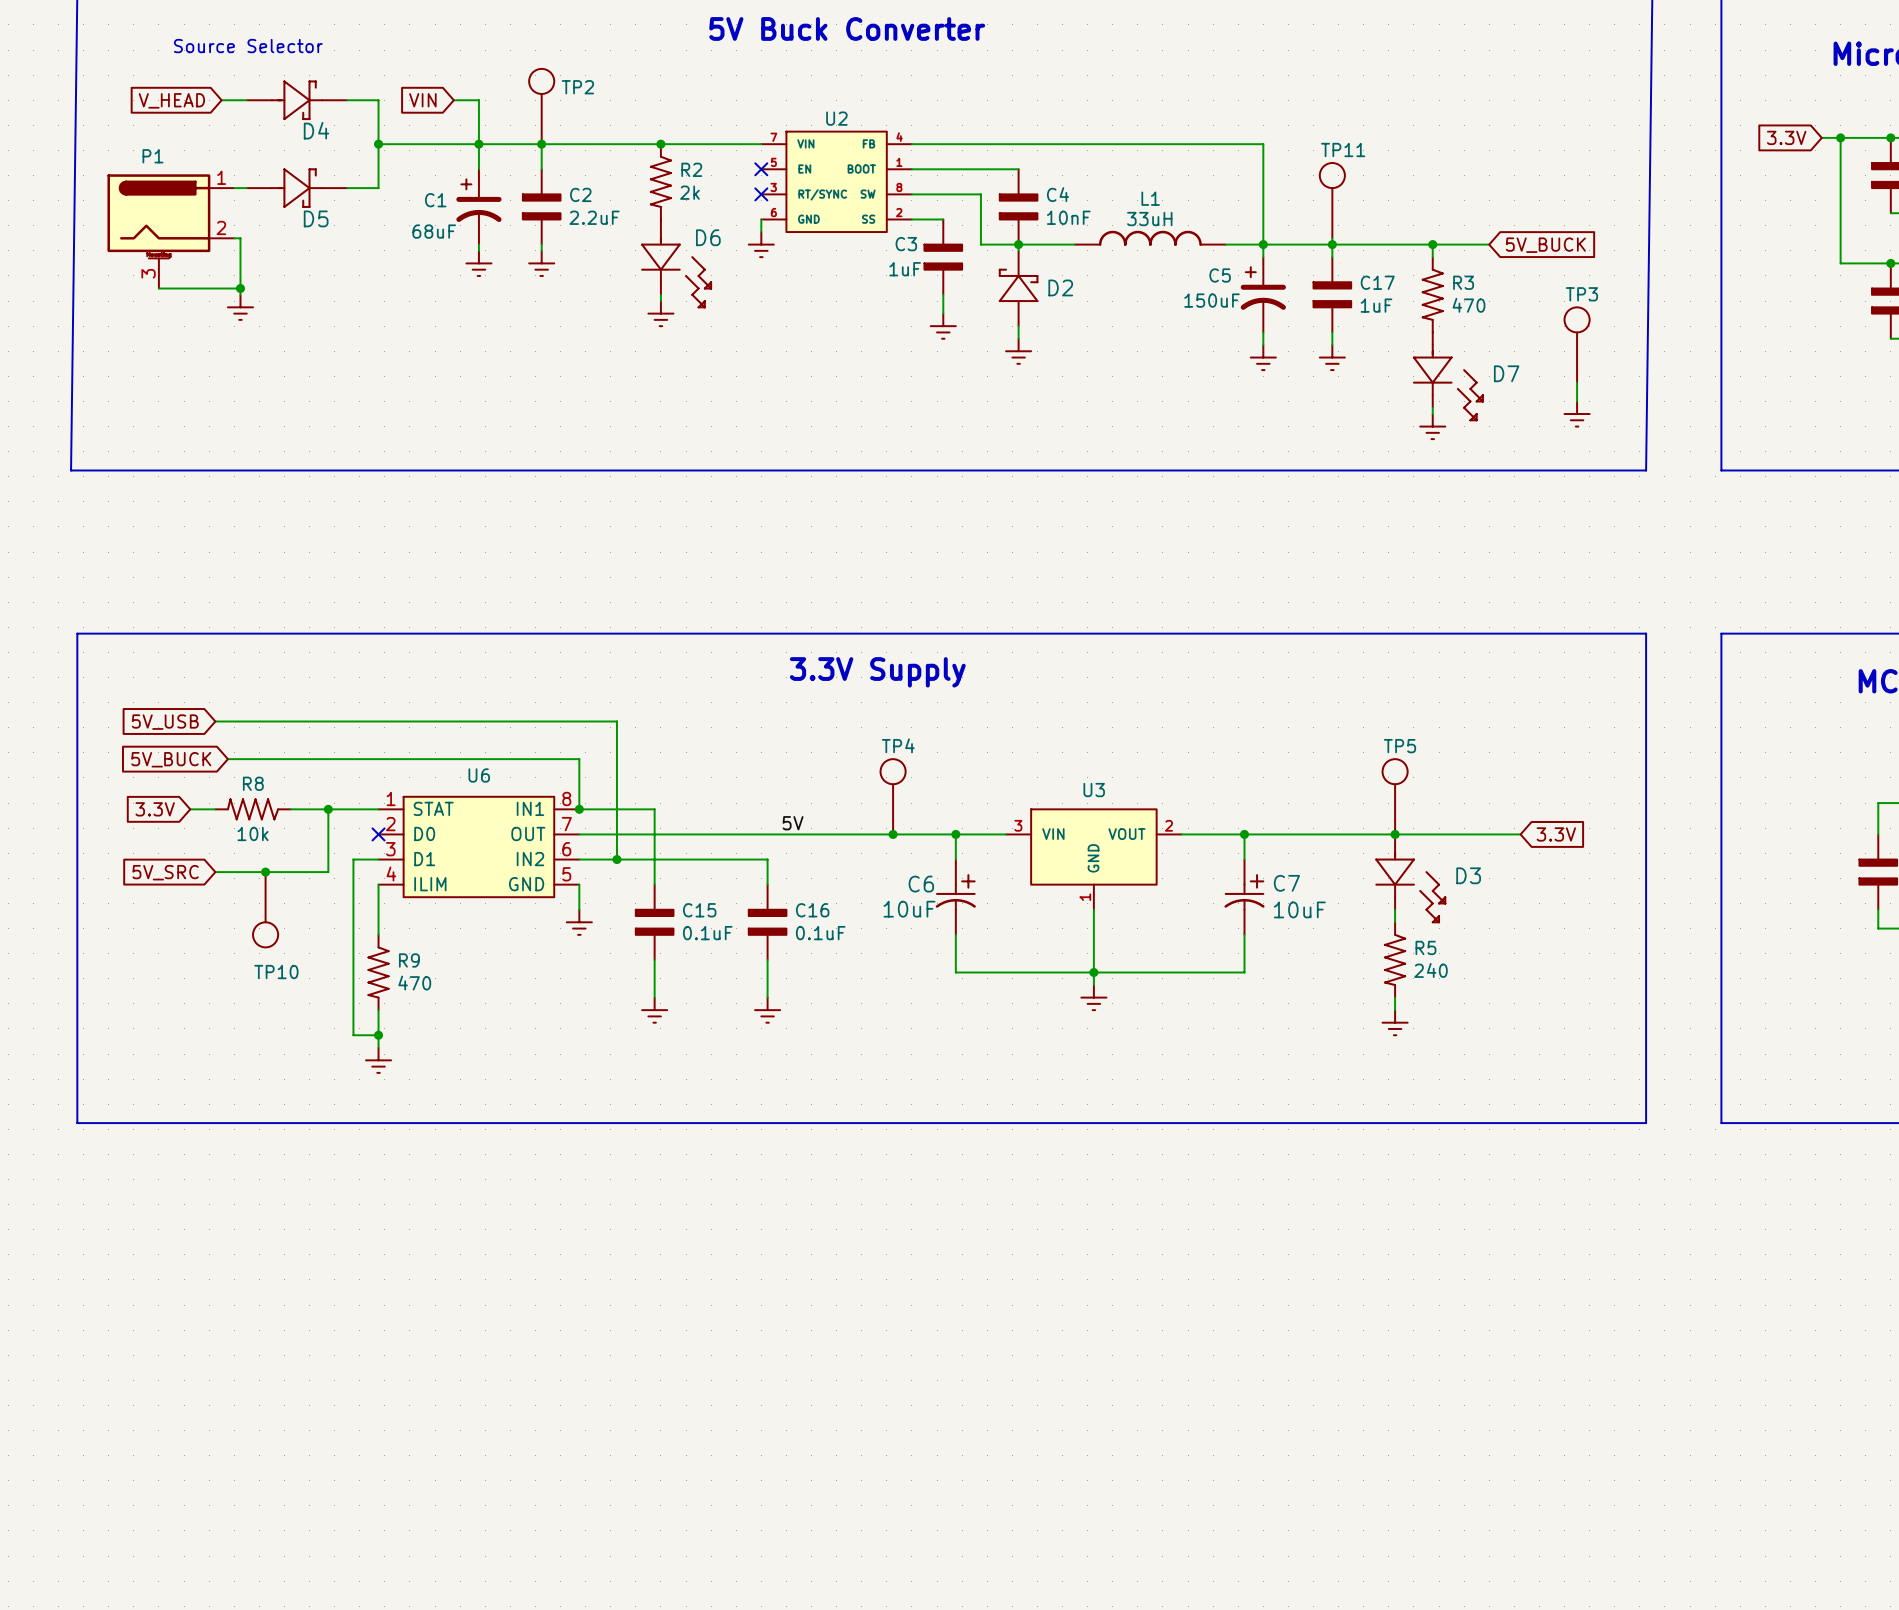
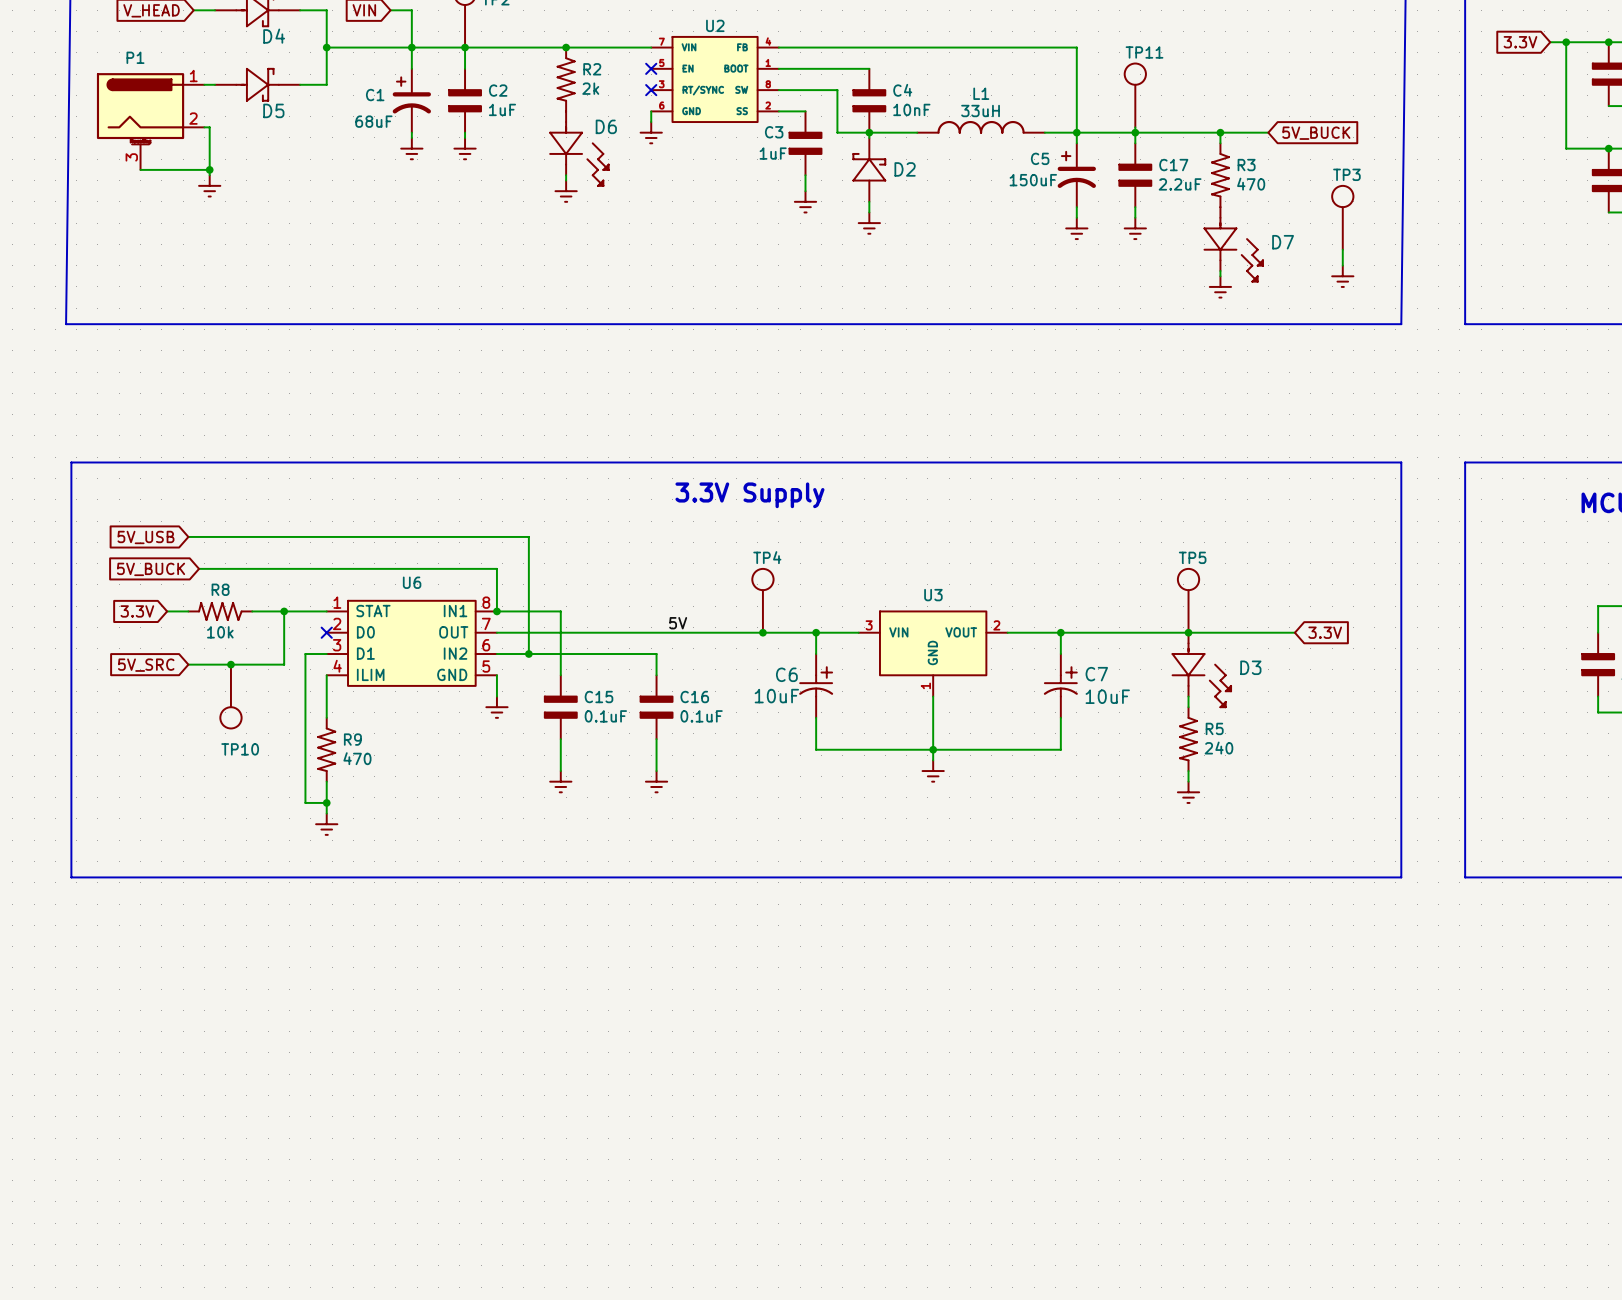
C2 value: 2.2uF (594, 217) -> 1uF (502, 109)
C17 value: 1uF (1376, 305) -> 2.2uF (1180, 184)

